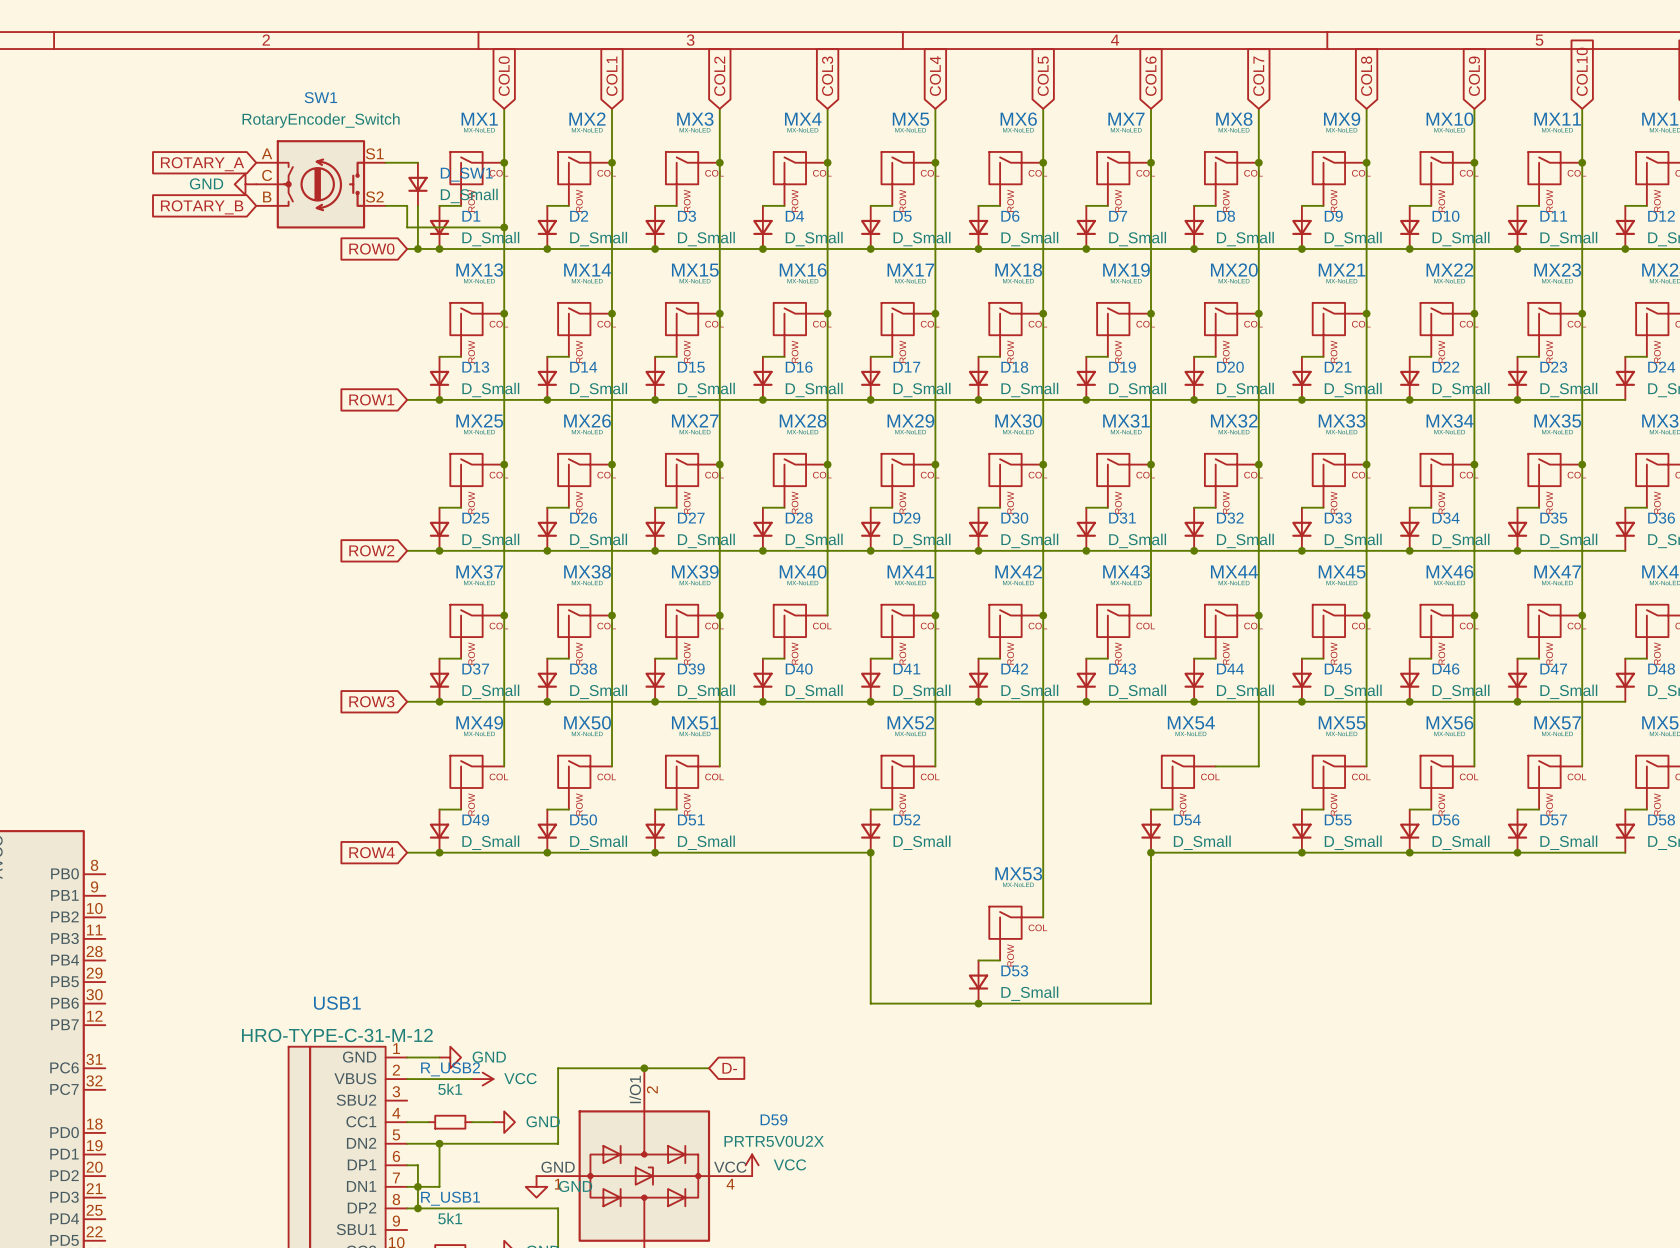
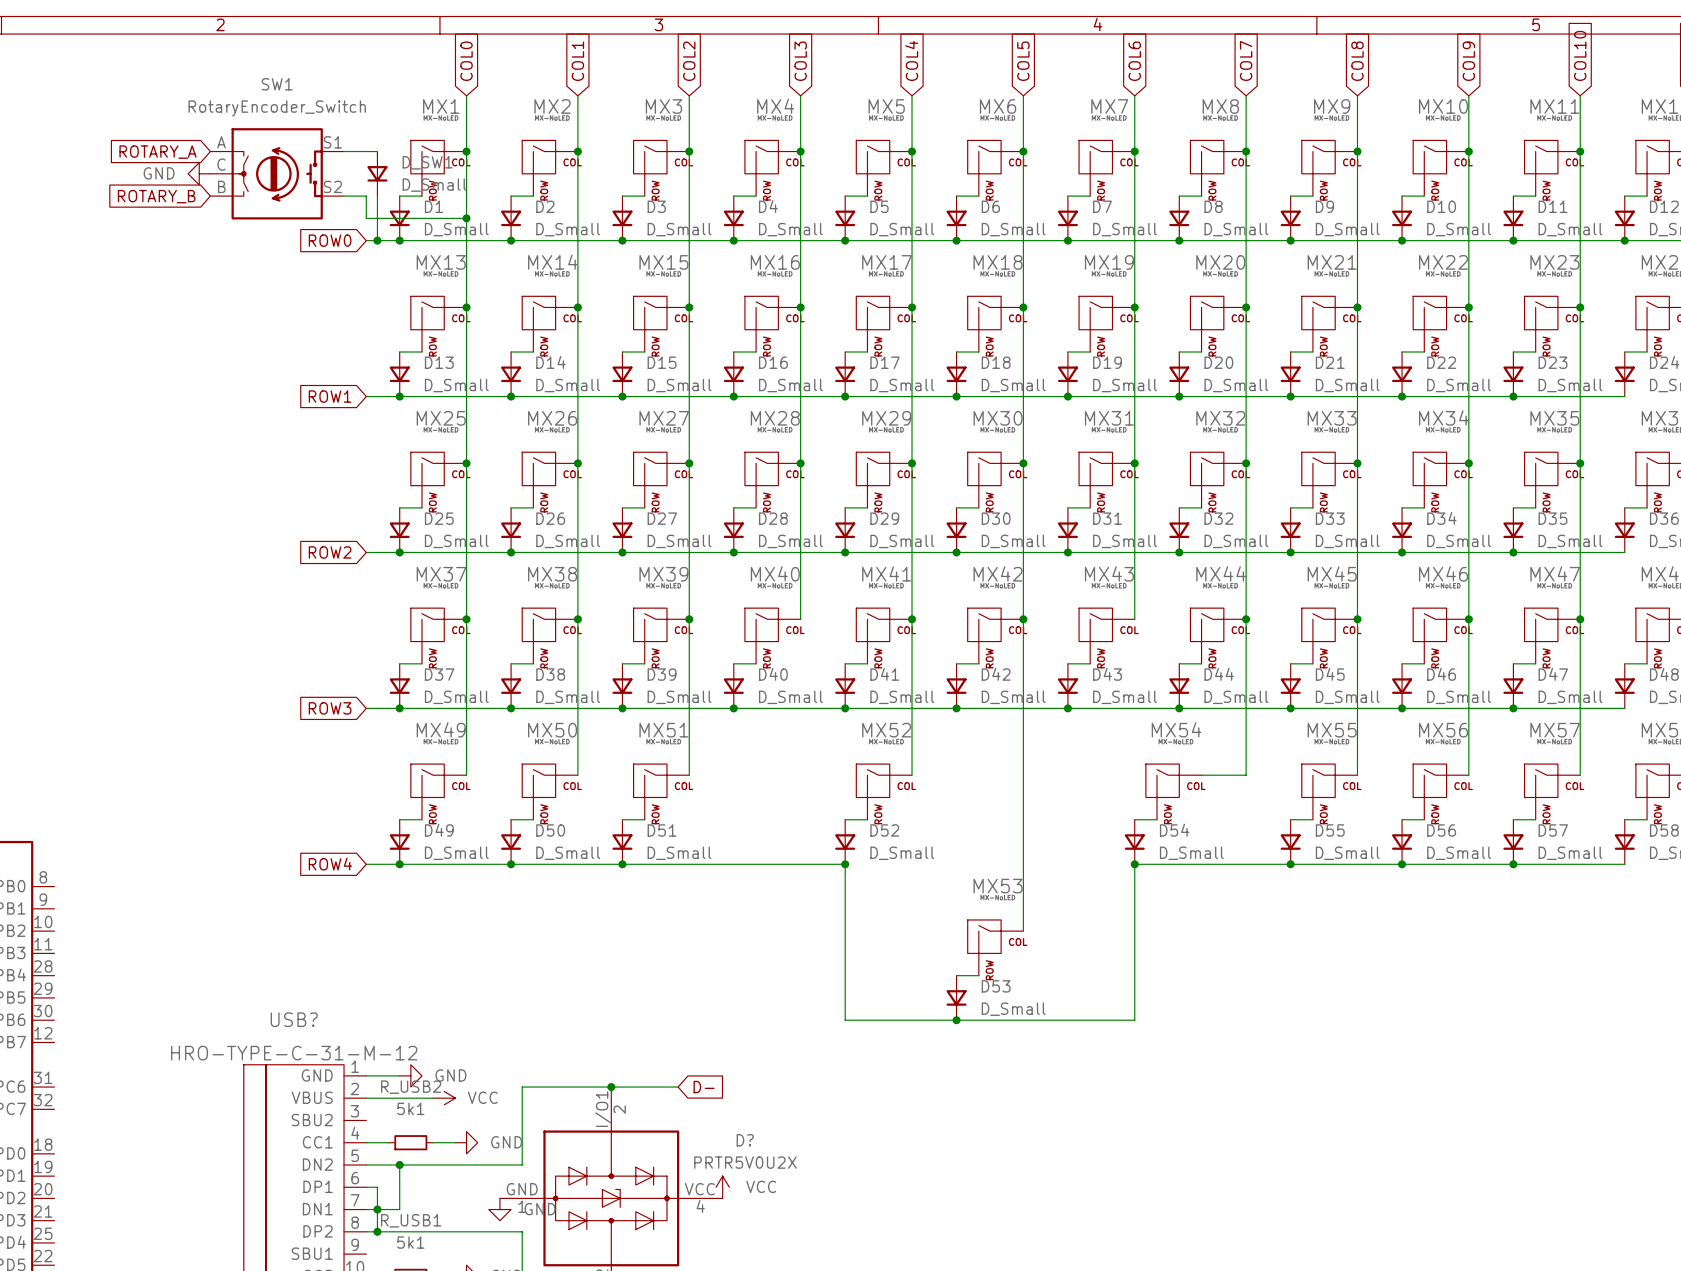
USB1 name: USB1 (337, 1003) -> USB? (294, 1019)
D59 name: D59 (773, 1119) -> D? (745, 1140)

